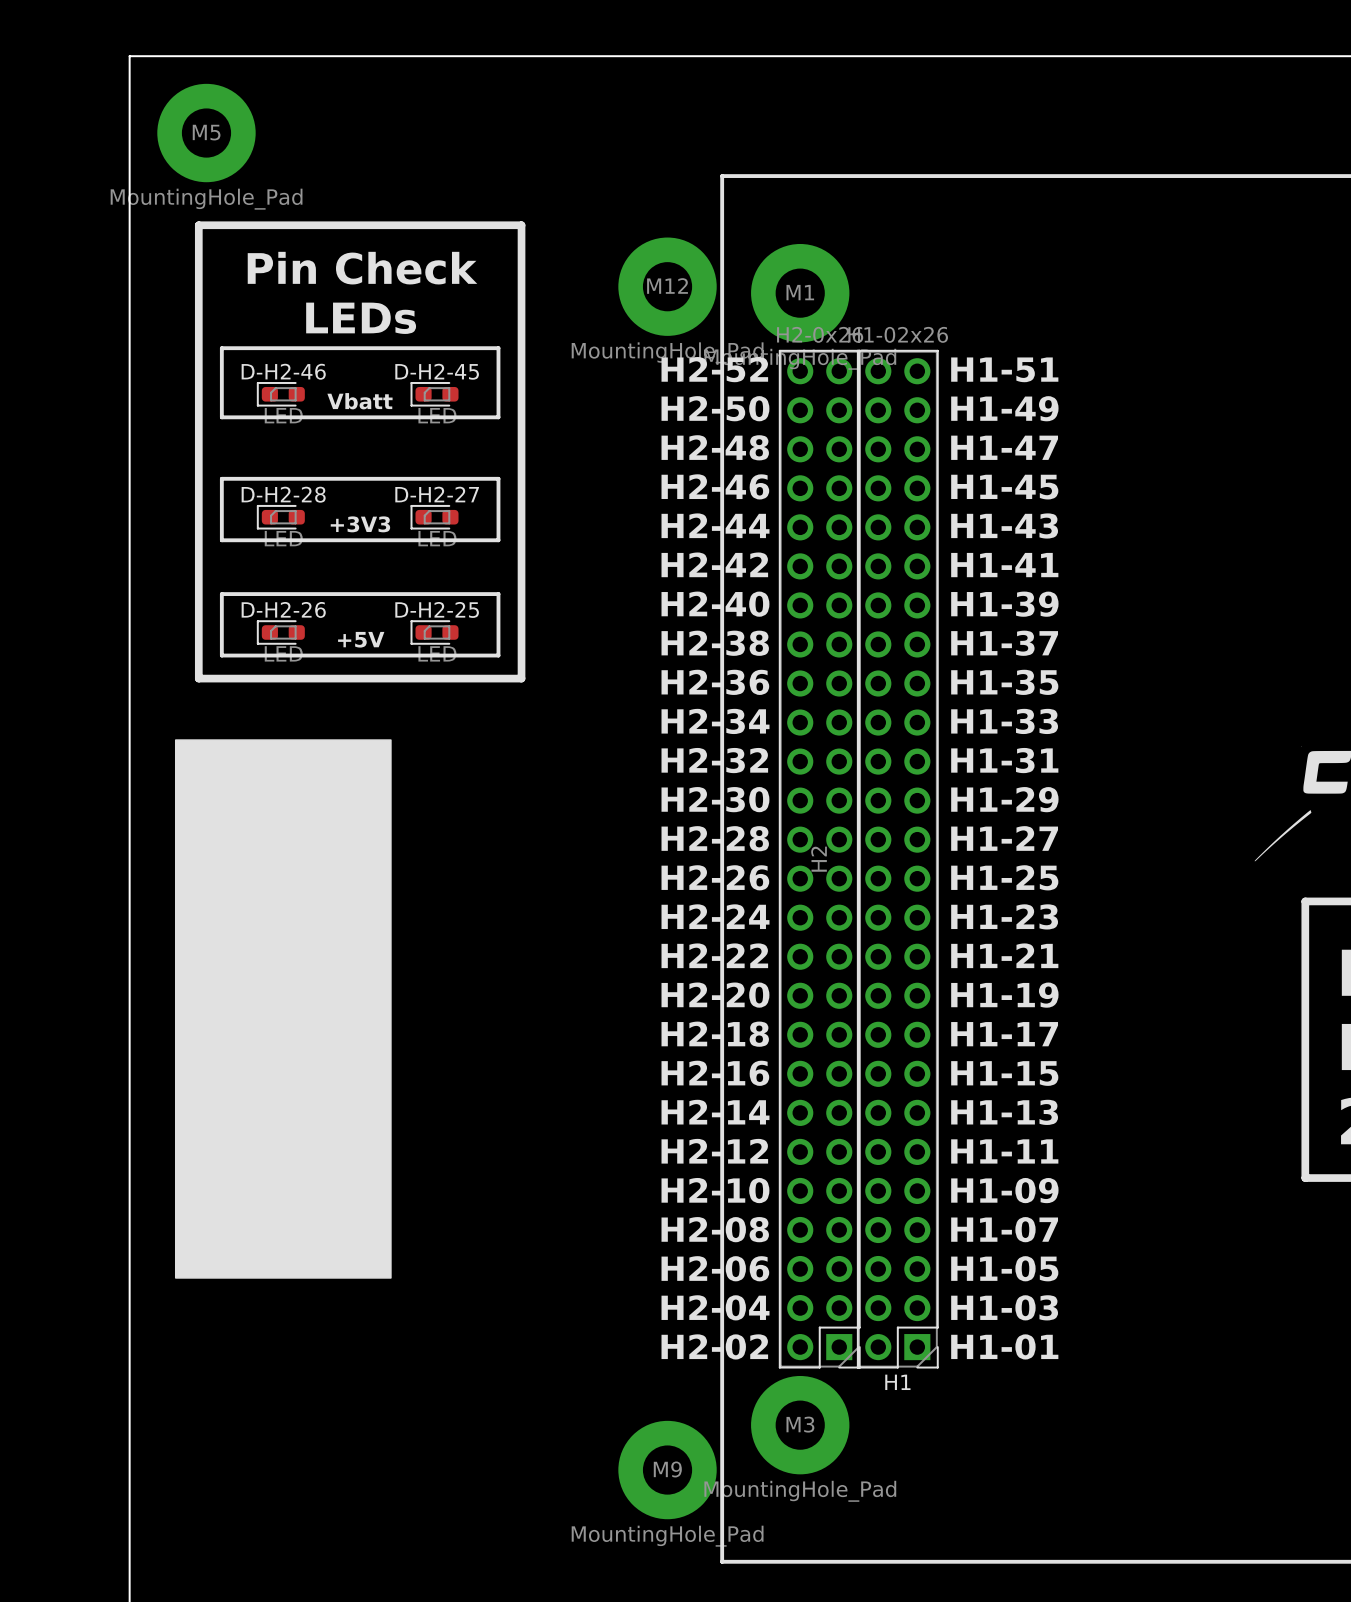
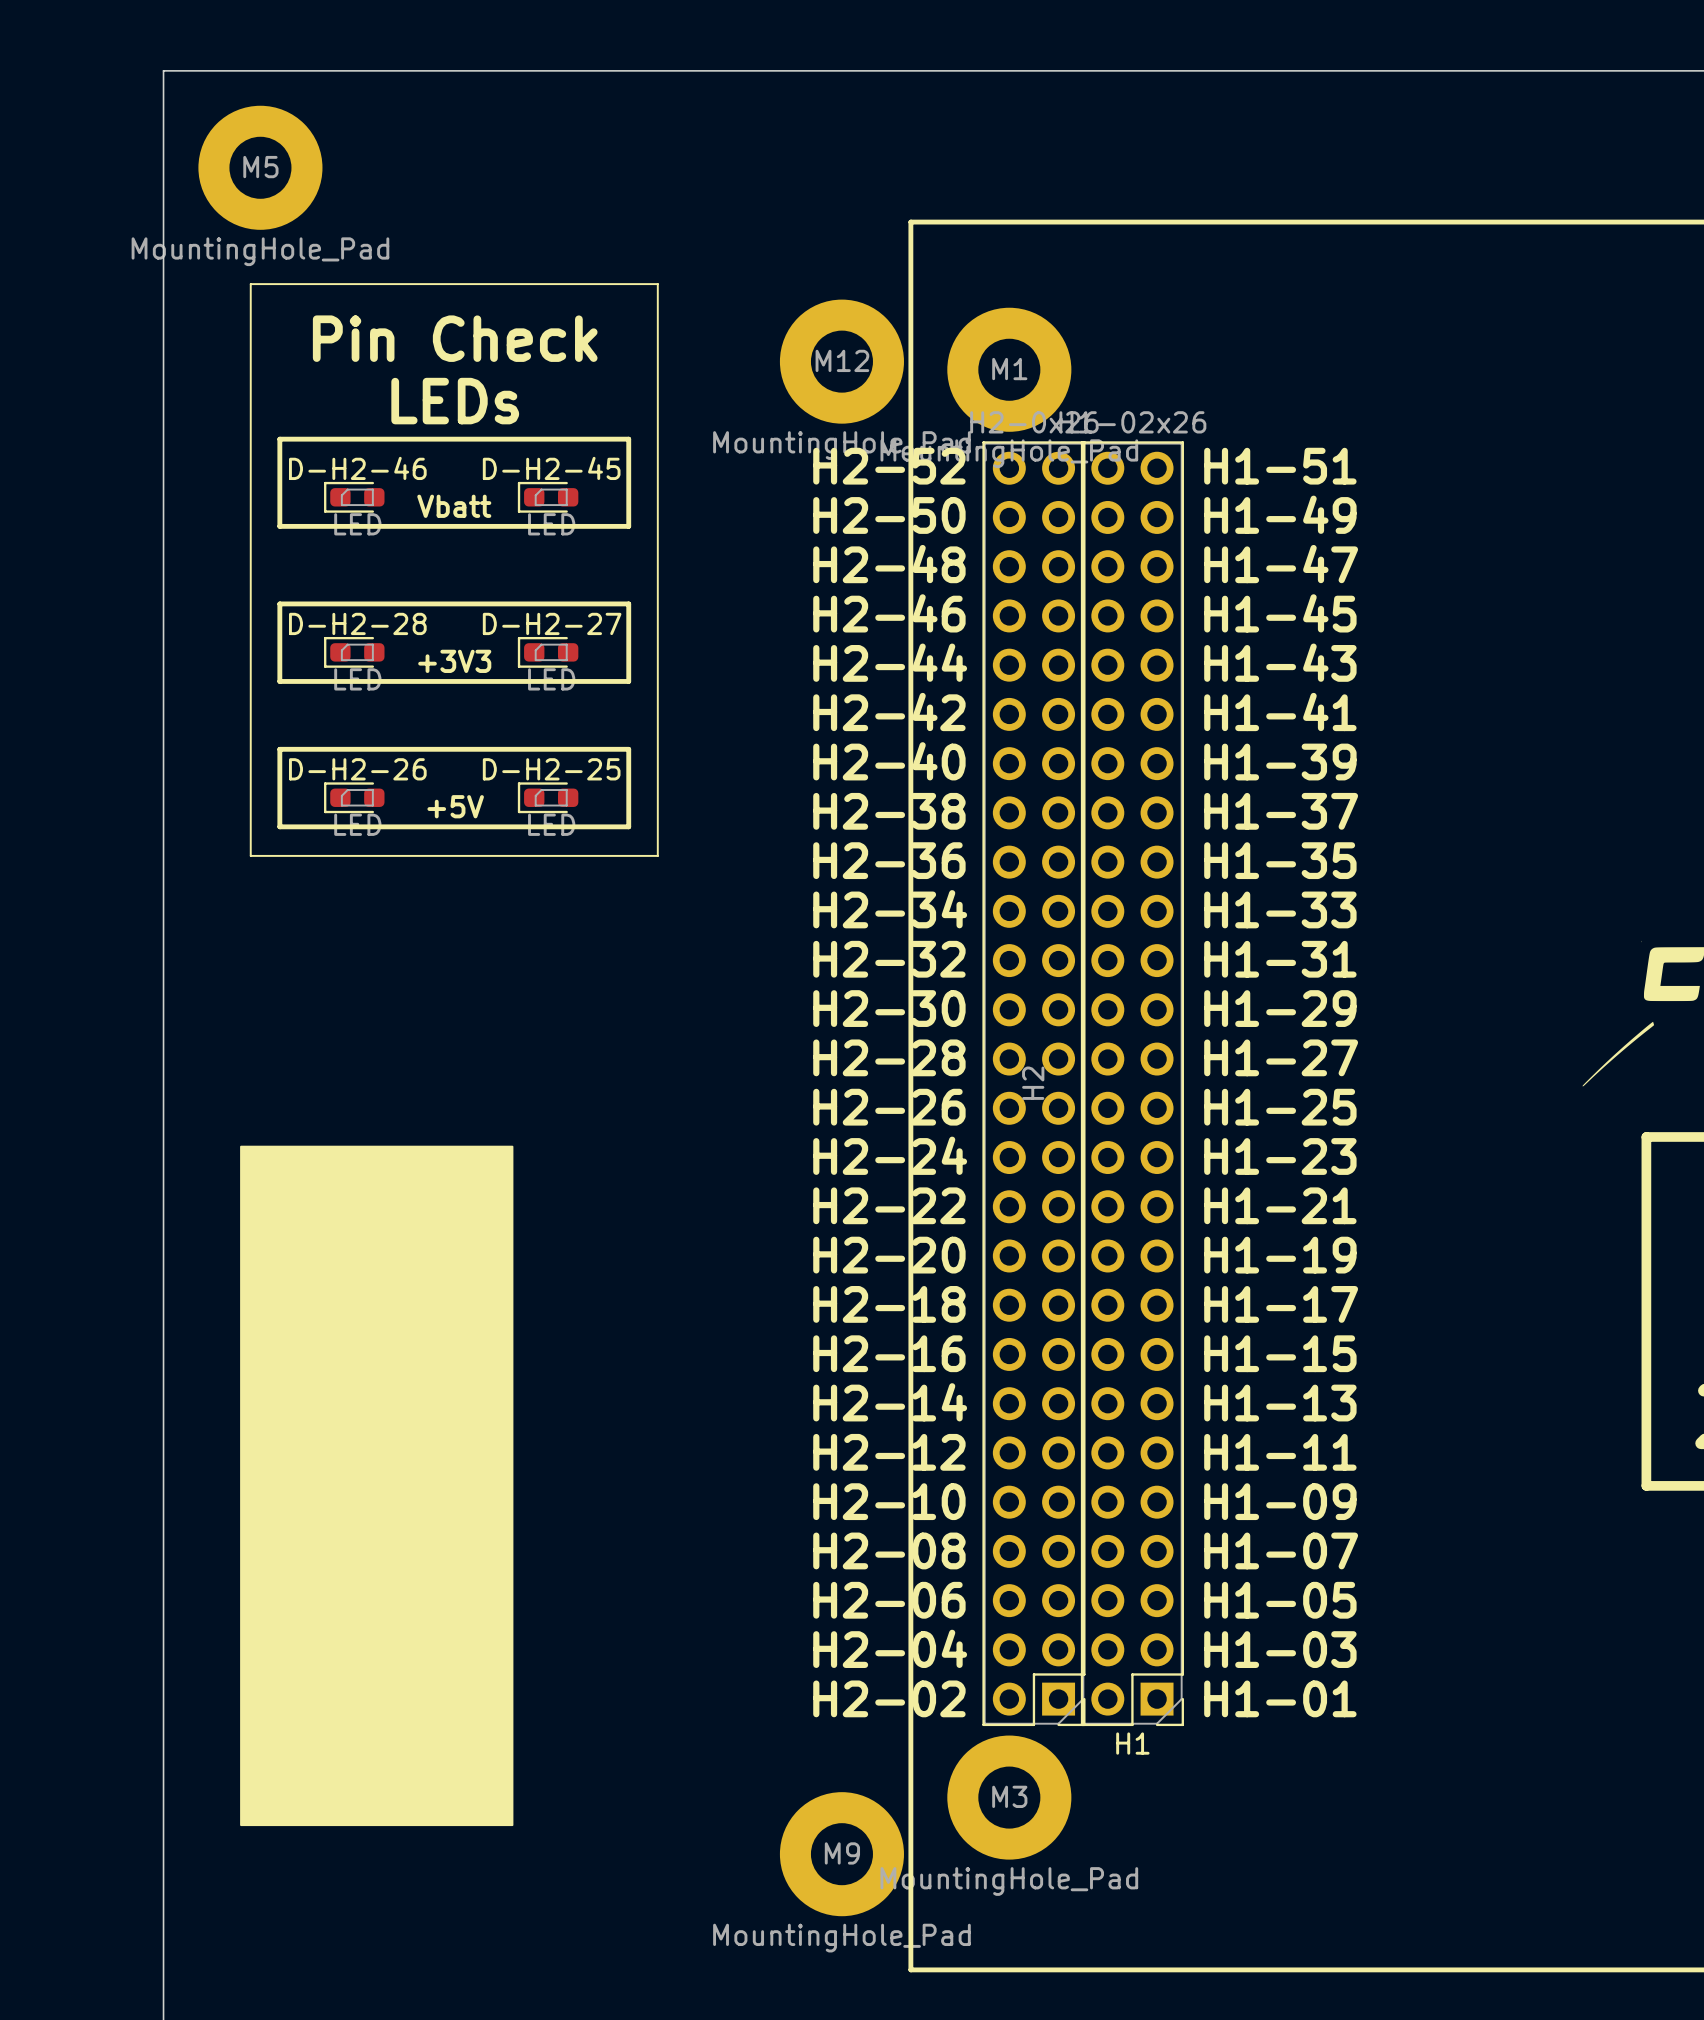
line width: thick (198, 225) (521, 225) (521, 678) (198, 678) (198, 225) -> thin (250, 284) (657, 284) (657, 855) (250, 855) (250, 284)
drawing position: (283, 1009) -> (376, 1485)

